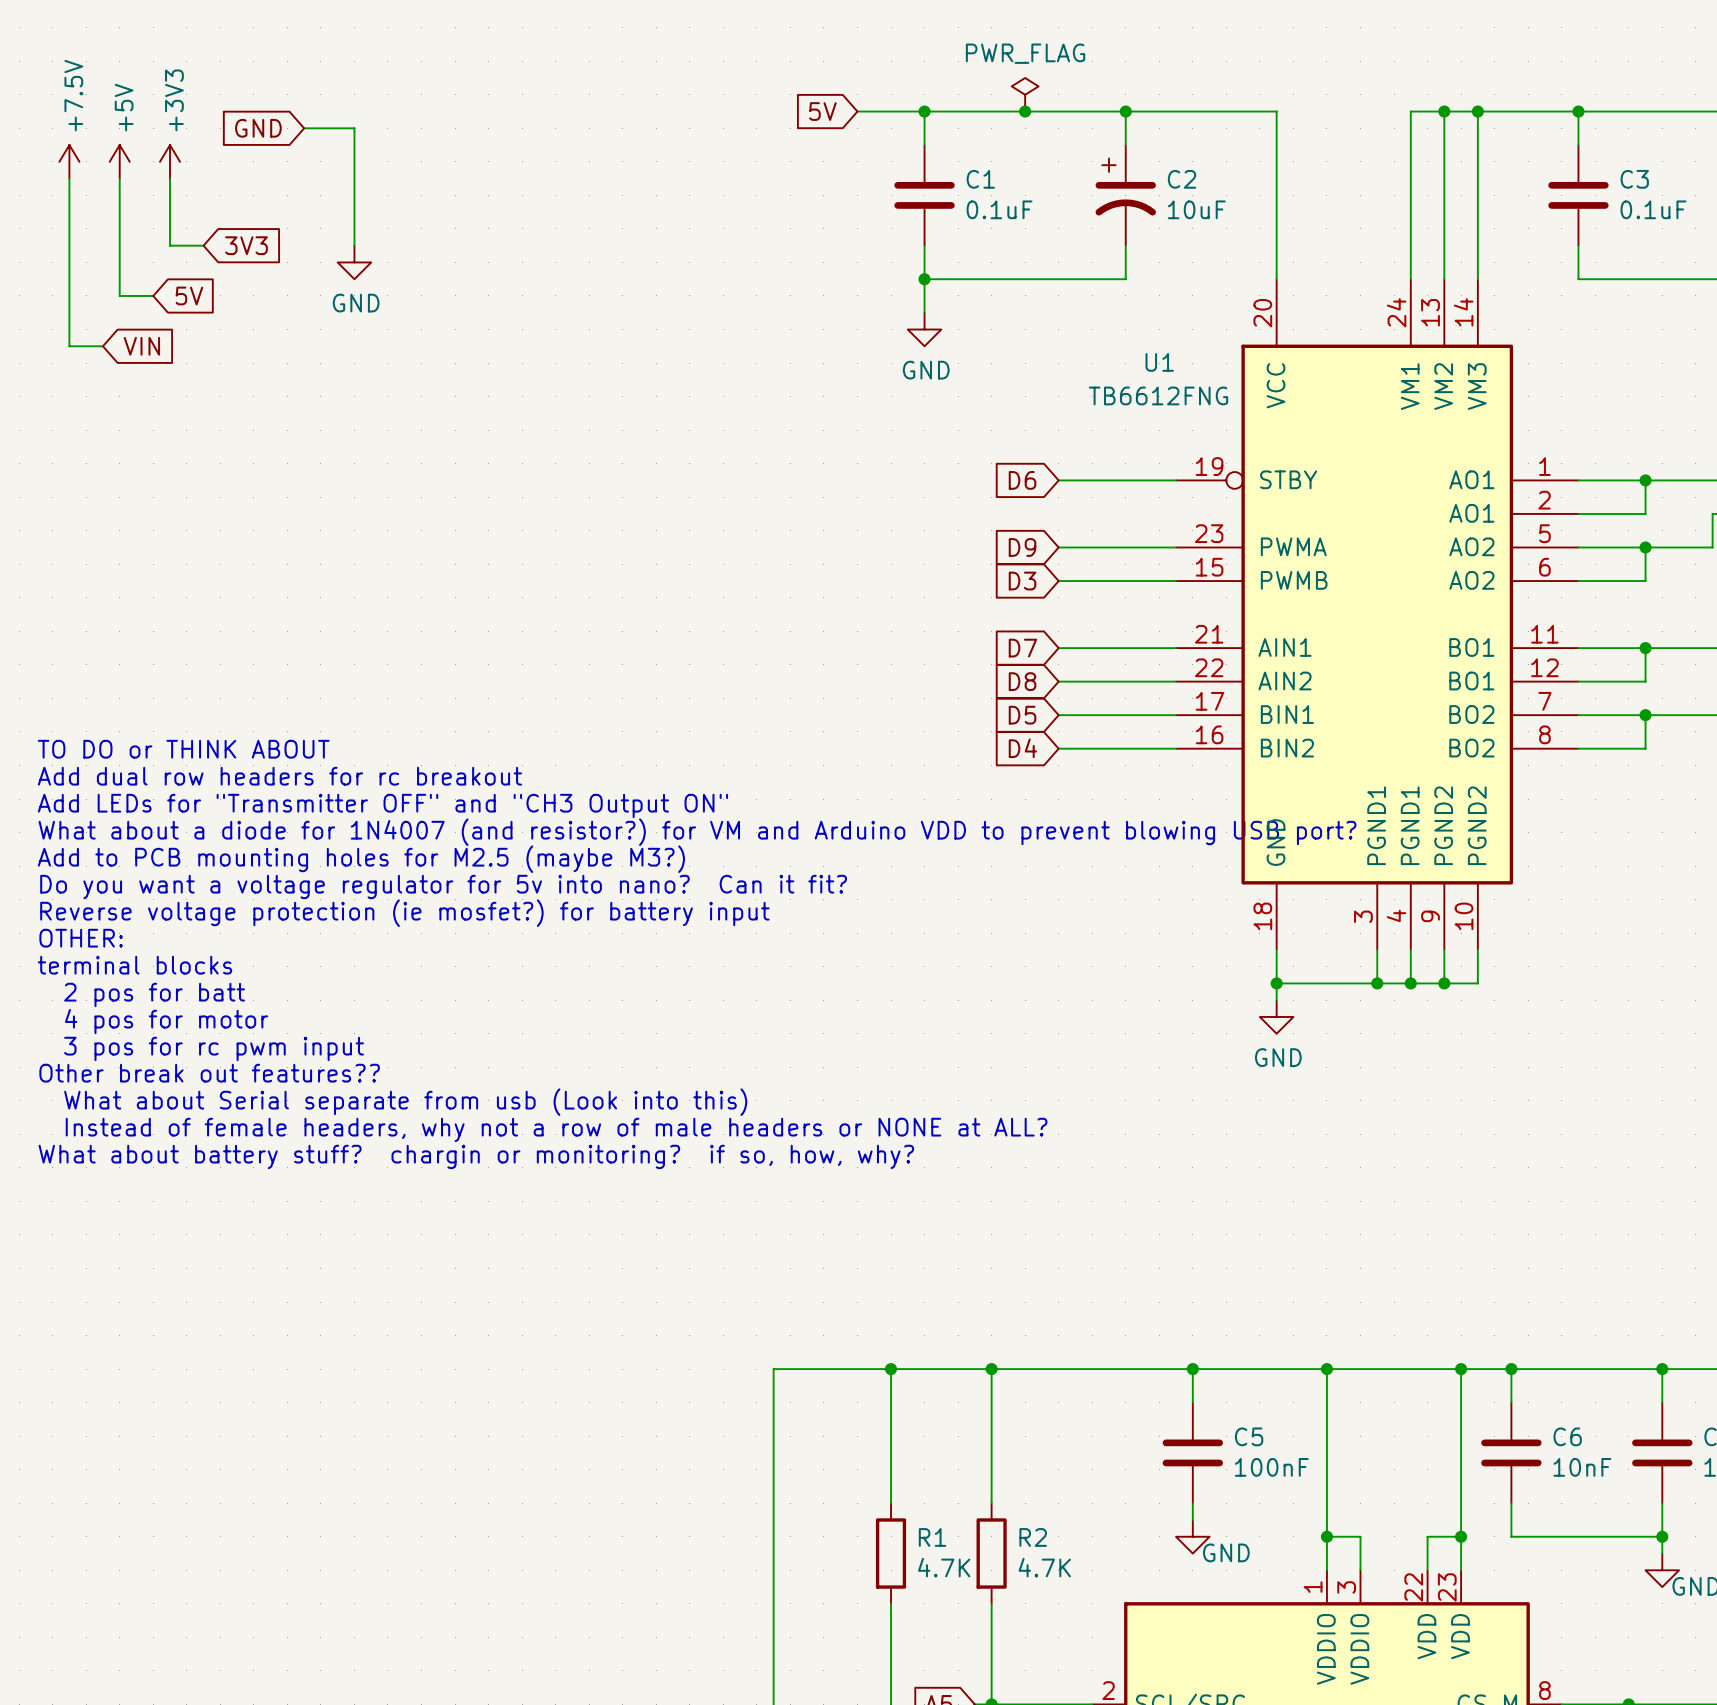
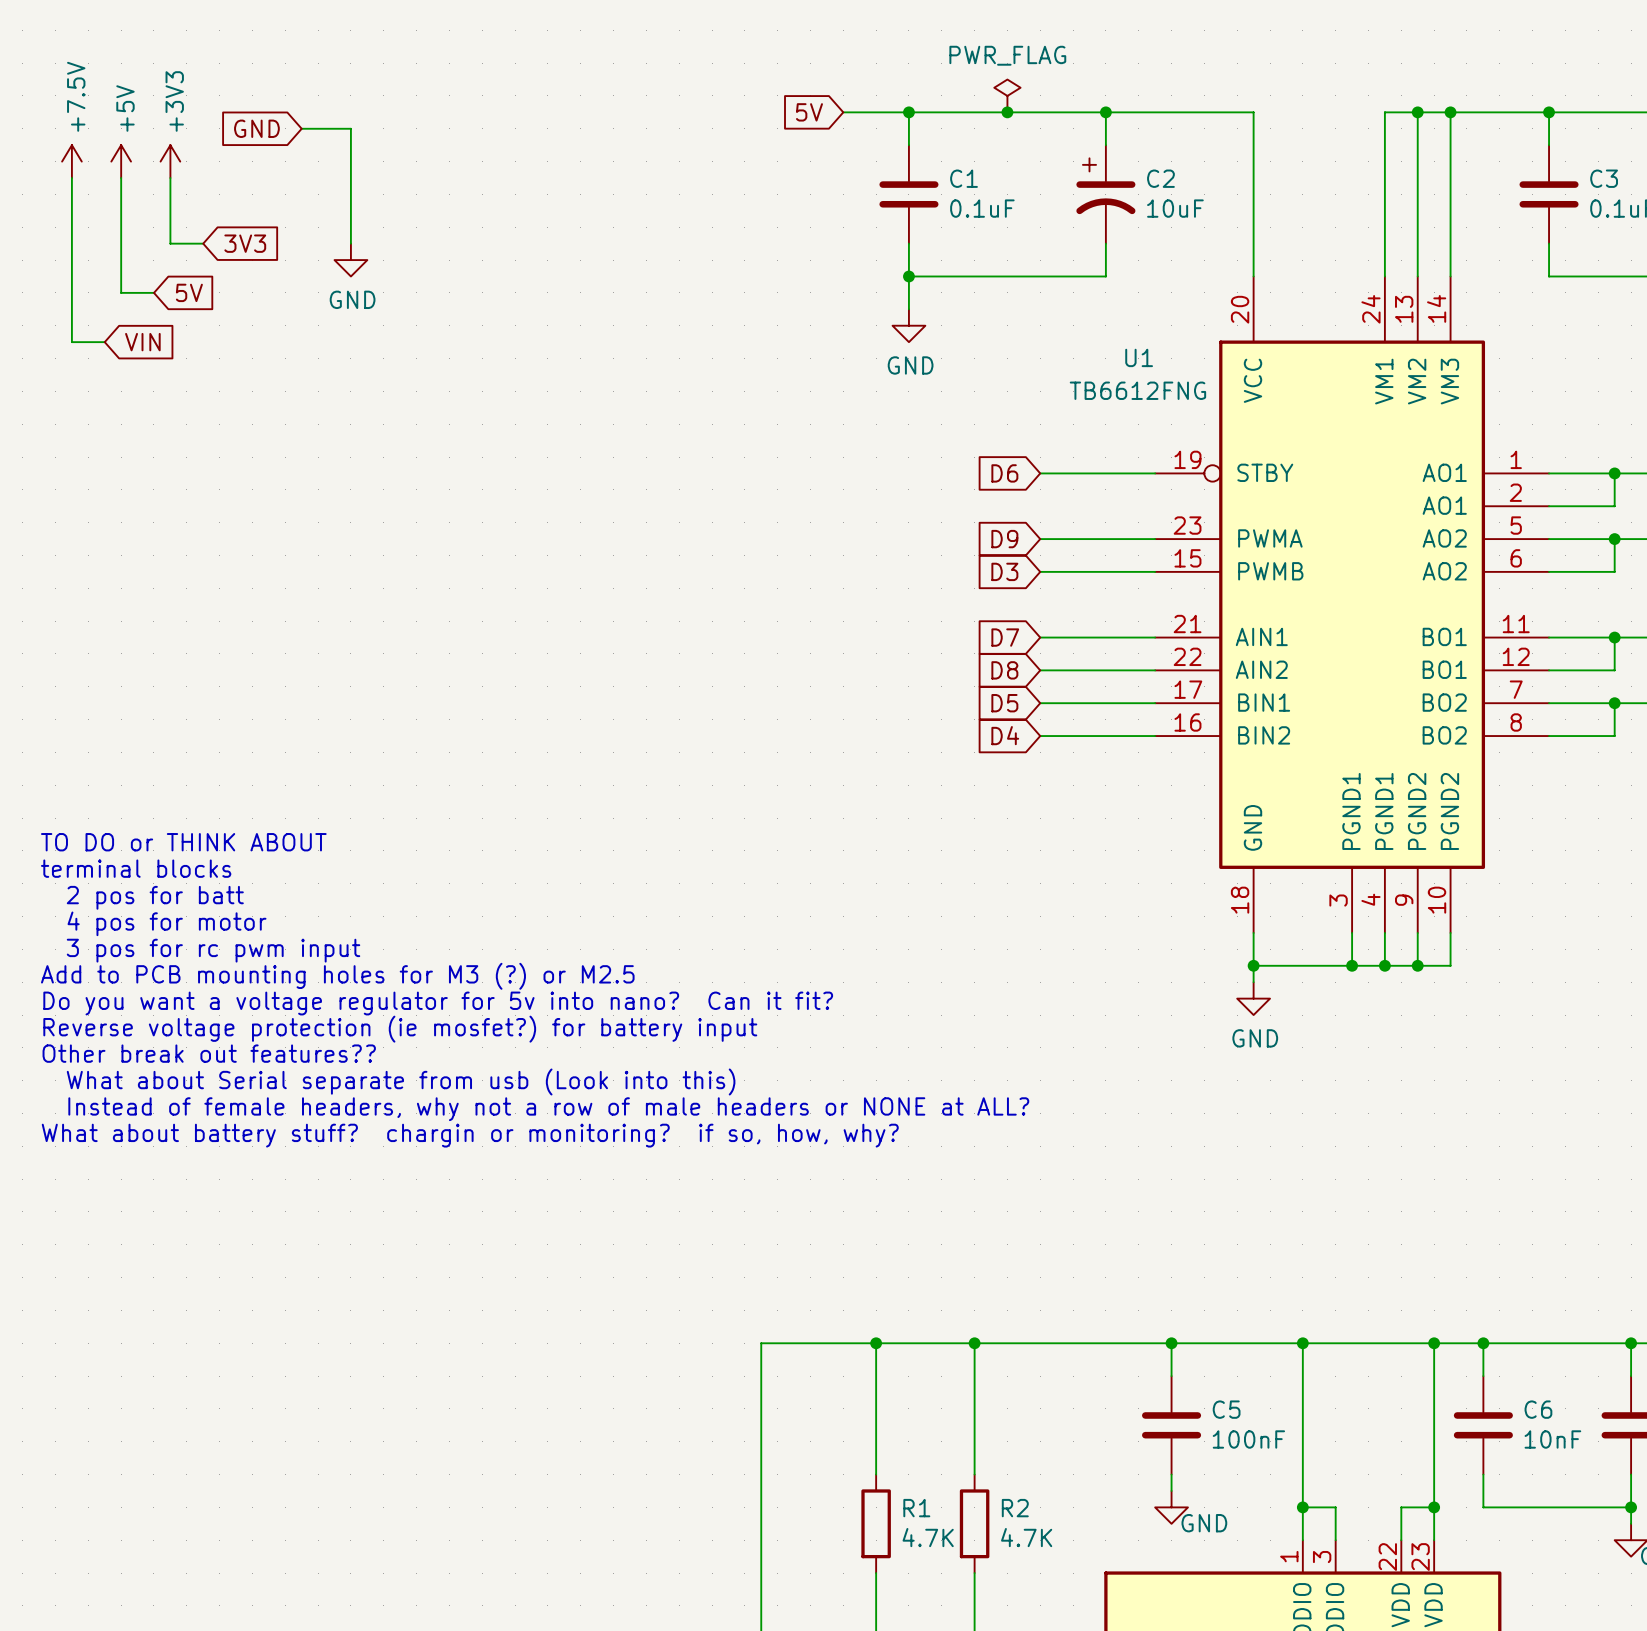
text: TO DO or THINK ABOUT (183, 749) -> none
text: Add dual row headers for rc breakout (279, 776) -> none
text: Add LEDs for "Transmitter OFF" and "CH3 Output ON" (382, 806) -> none
text: What about a diode for 1N4007 (and resistor?) for VM and Arduino VDD to prevent blowing USB port? (697, 832) -> none
text: Add to PCB mounting holes for M2.5 (maybe M3?) (361, 859) -> TO DO or THINK ABOUT (183, 842)
text: Do you want a voltage regulator for 5v into nano? Can it fit? (443, 886) -> terminal blocks (136, 868)
text: Reverse voltage protection (ie mosfet?) for battery input (404, 913) -> 2 pos for batt (155, 897)
text: OTHER: (81, 938) -> 4 pos for motor (167, 923)
text: terminal blocks (135, 965) -> 3 pos for rc pwm input (213, 950)
text: 2 pos for batt (154, 994) -> Add to PCB mounting holes for M3 (?) or M2.5 (337, 976)
text: 4 pos for motor (166, 1021) -> Do you want a voltage regulator for 5v into nano? Can it fit? (438, 1003)
text: 3 pos for rc pwm input (214, 1048) -> Reverse voltage protection (ie mosfet?) for battery input (400, 1029)

